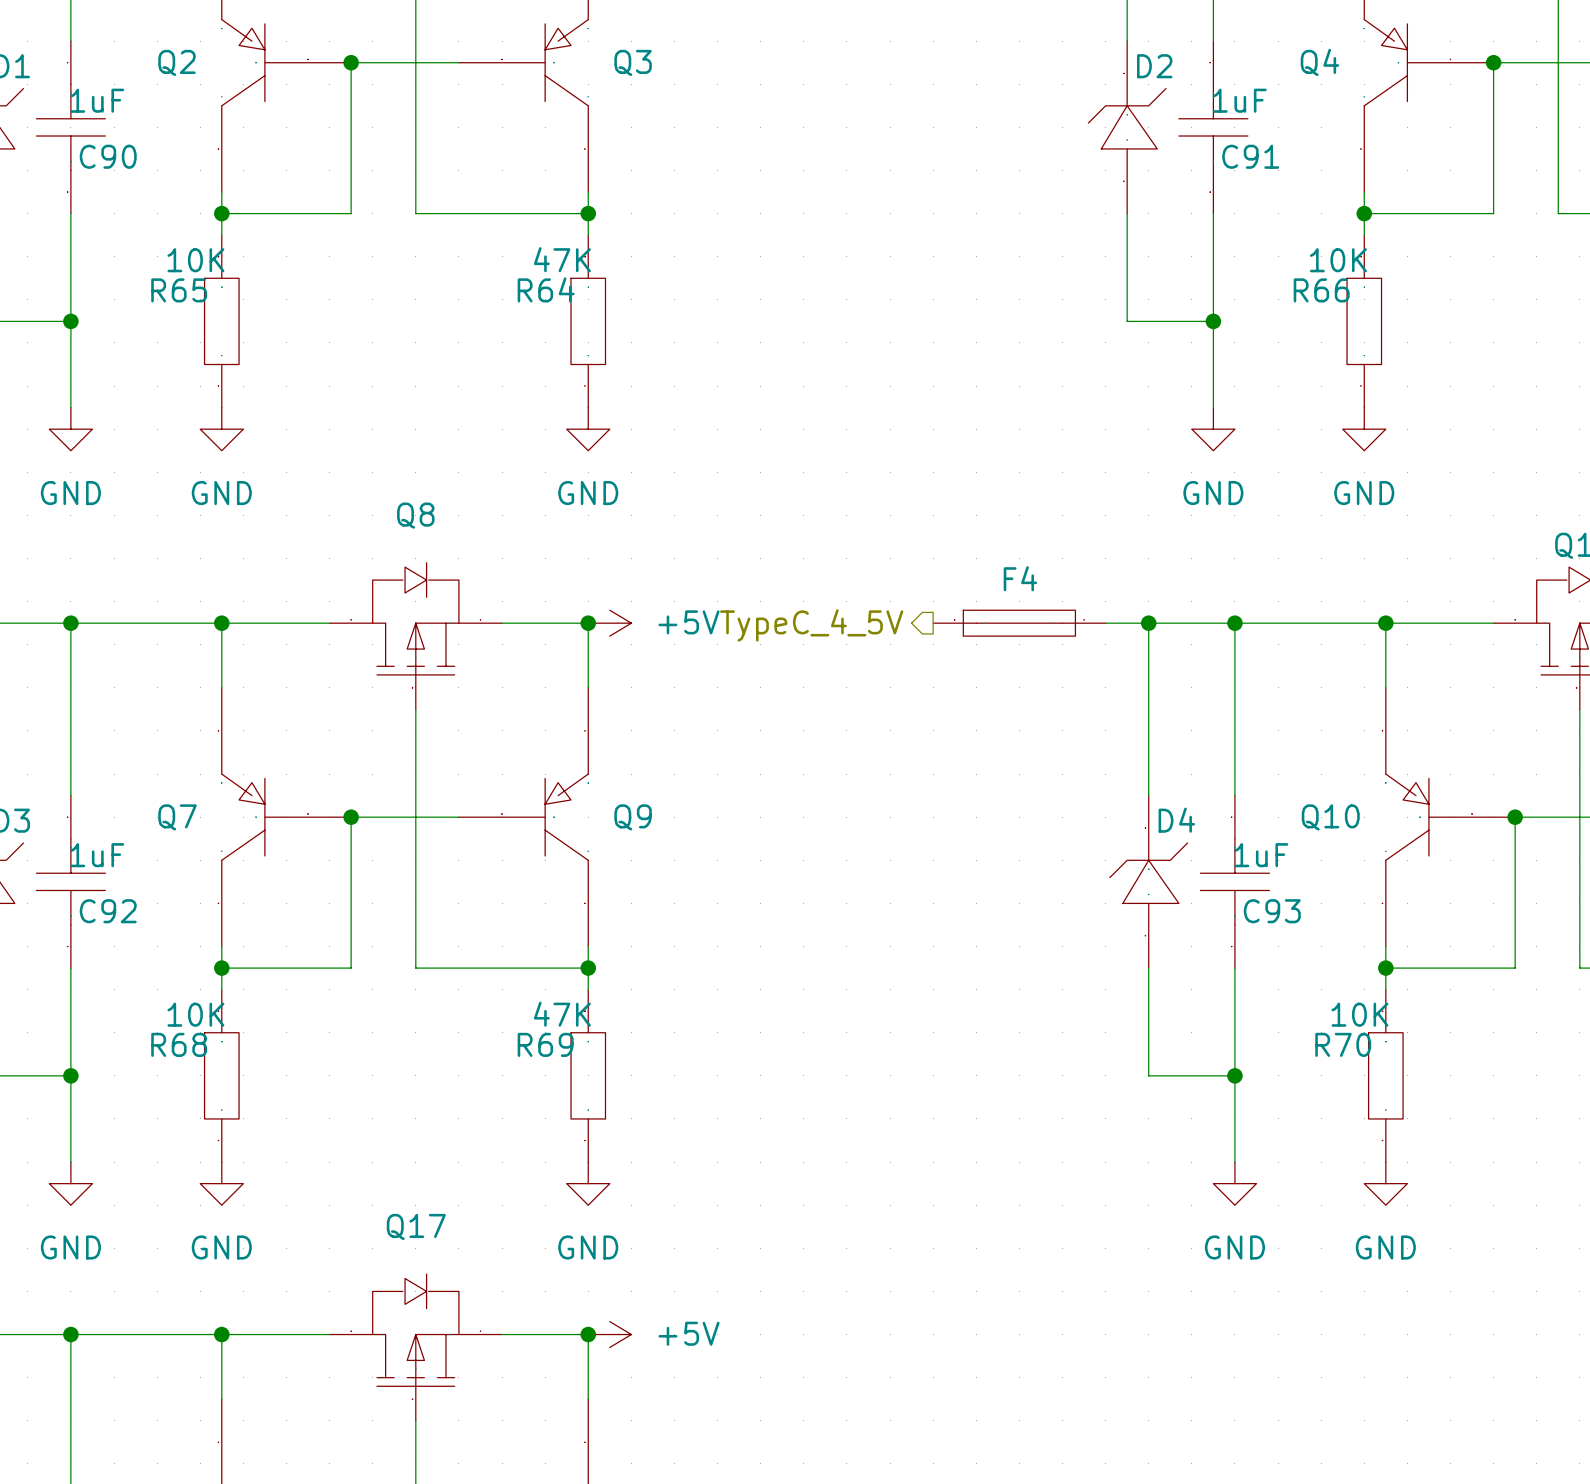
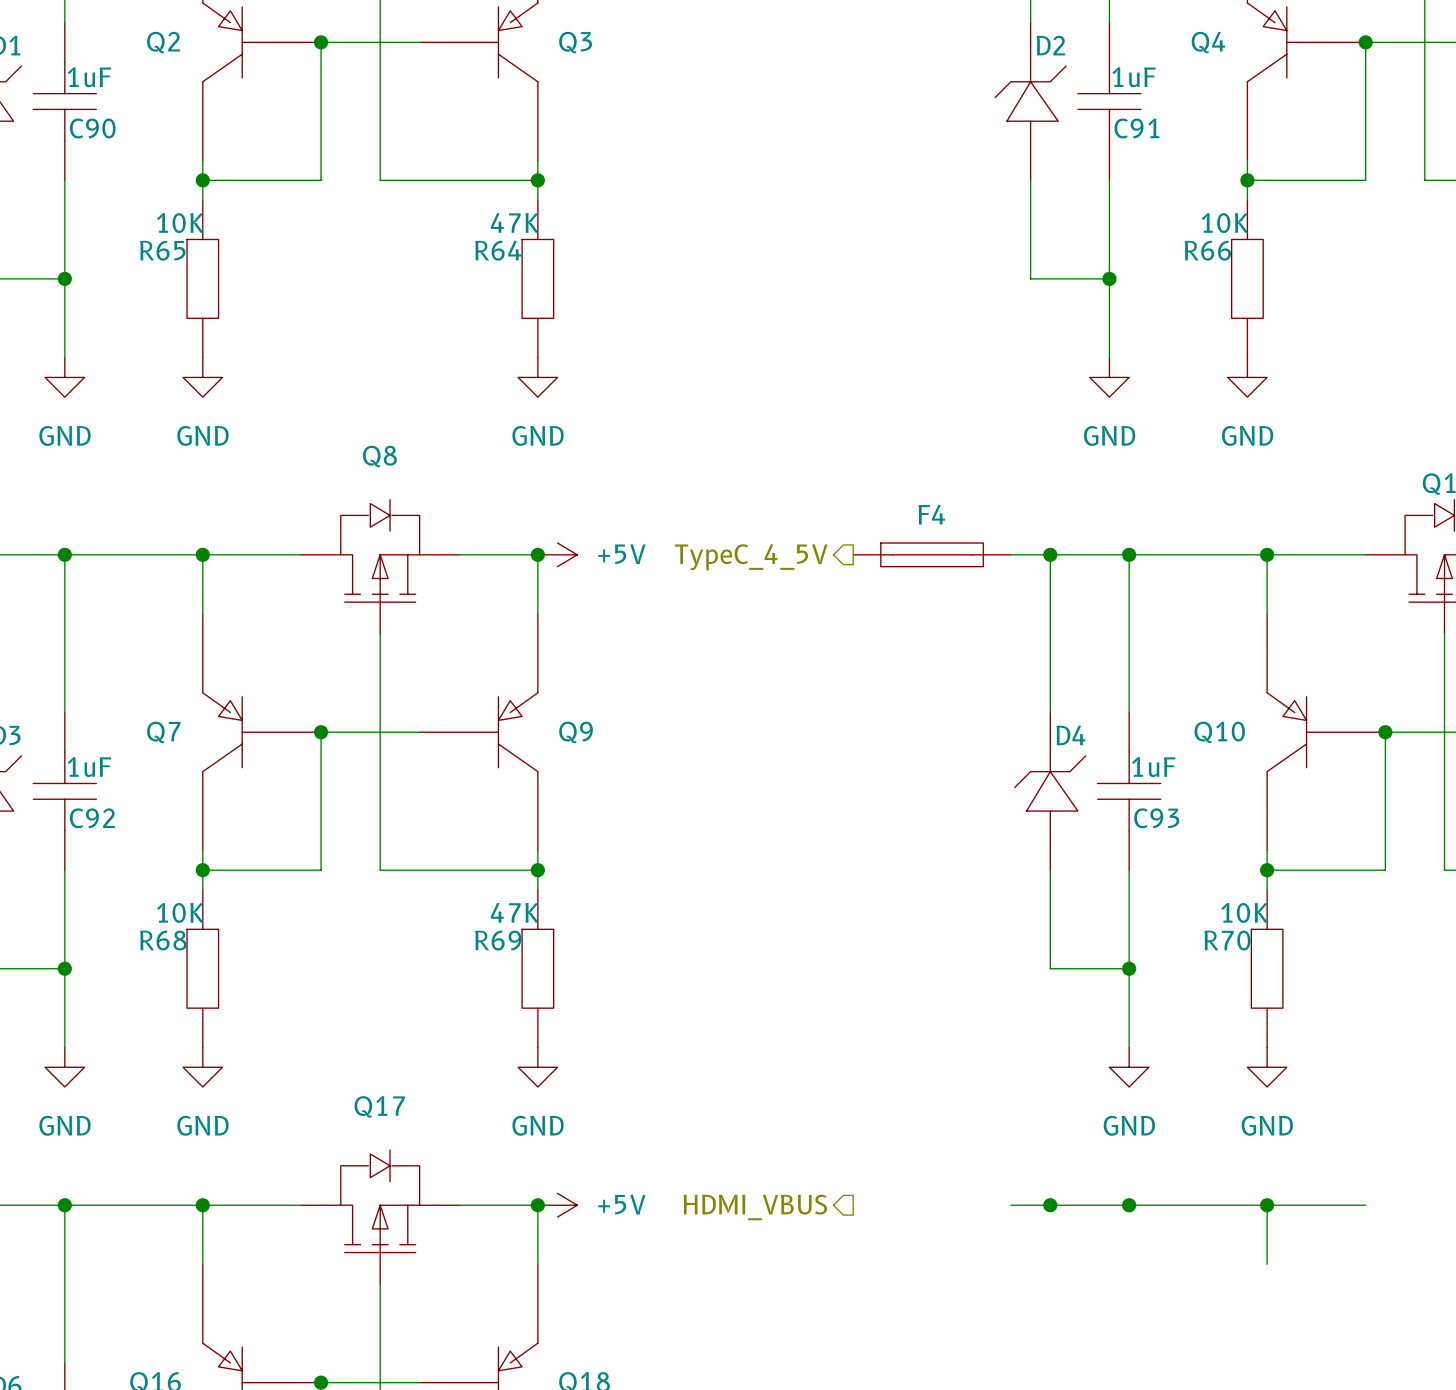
hierarchical label: none -> HDMI_VBUS (755, 1207)
wire: none -> (1010, 1205) (1365, 1205)
junction: none -> (1050, 1205)
junction: none -> (1129, 1205)
wire: none -> (1267, 1205) (1267, 1264)
junction: none -> (1267, 1205)

